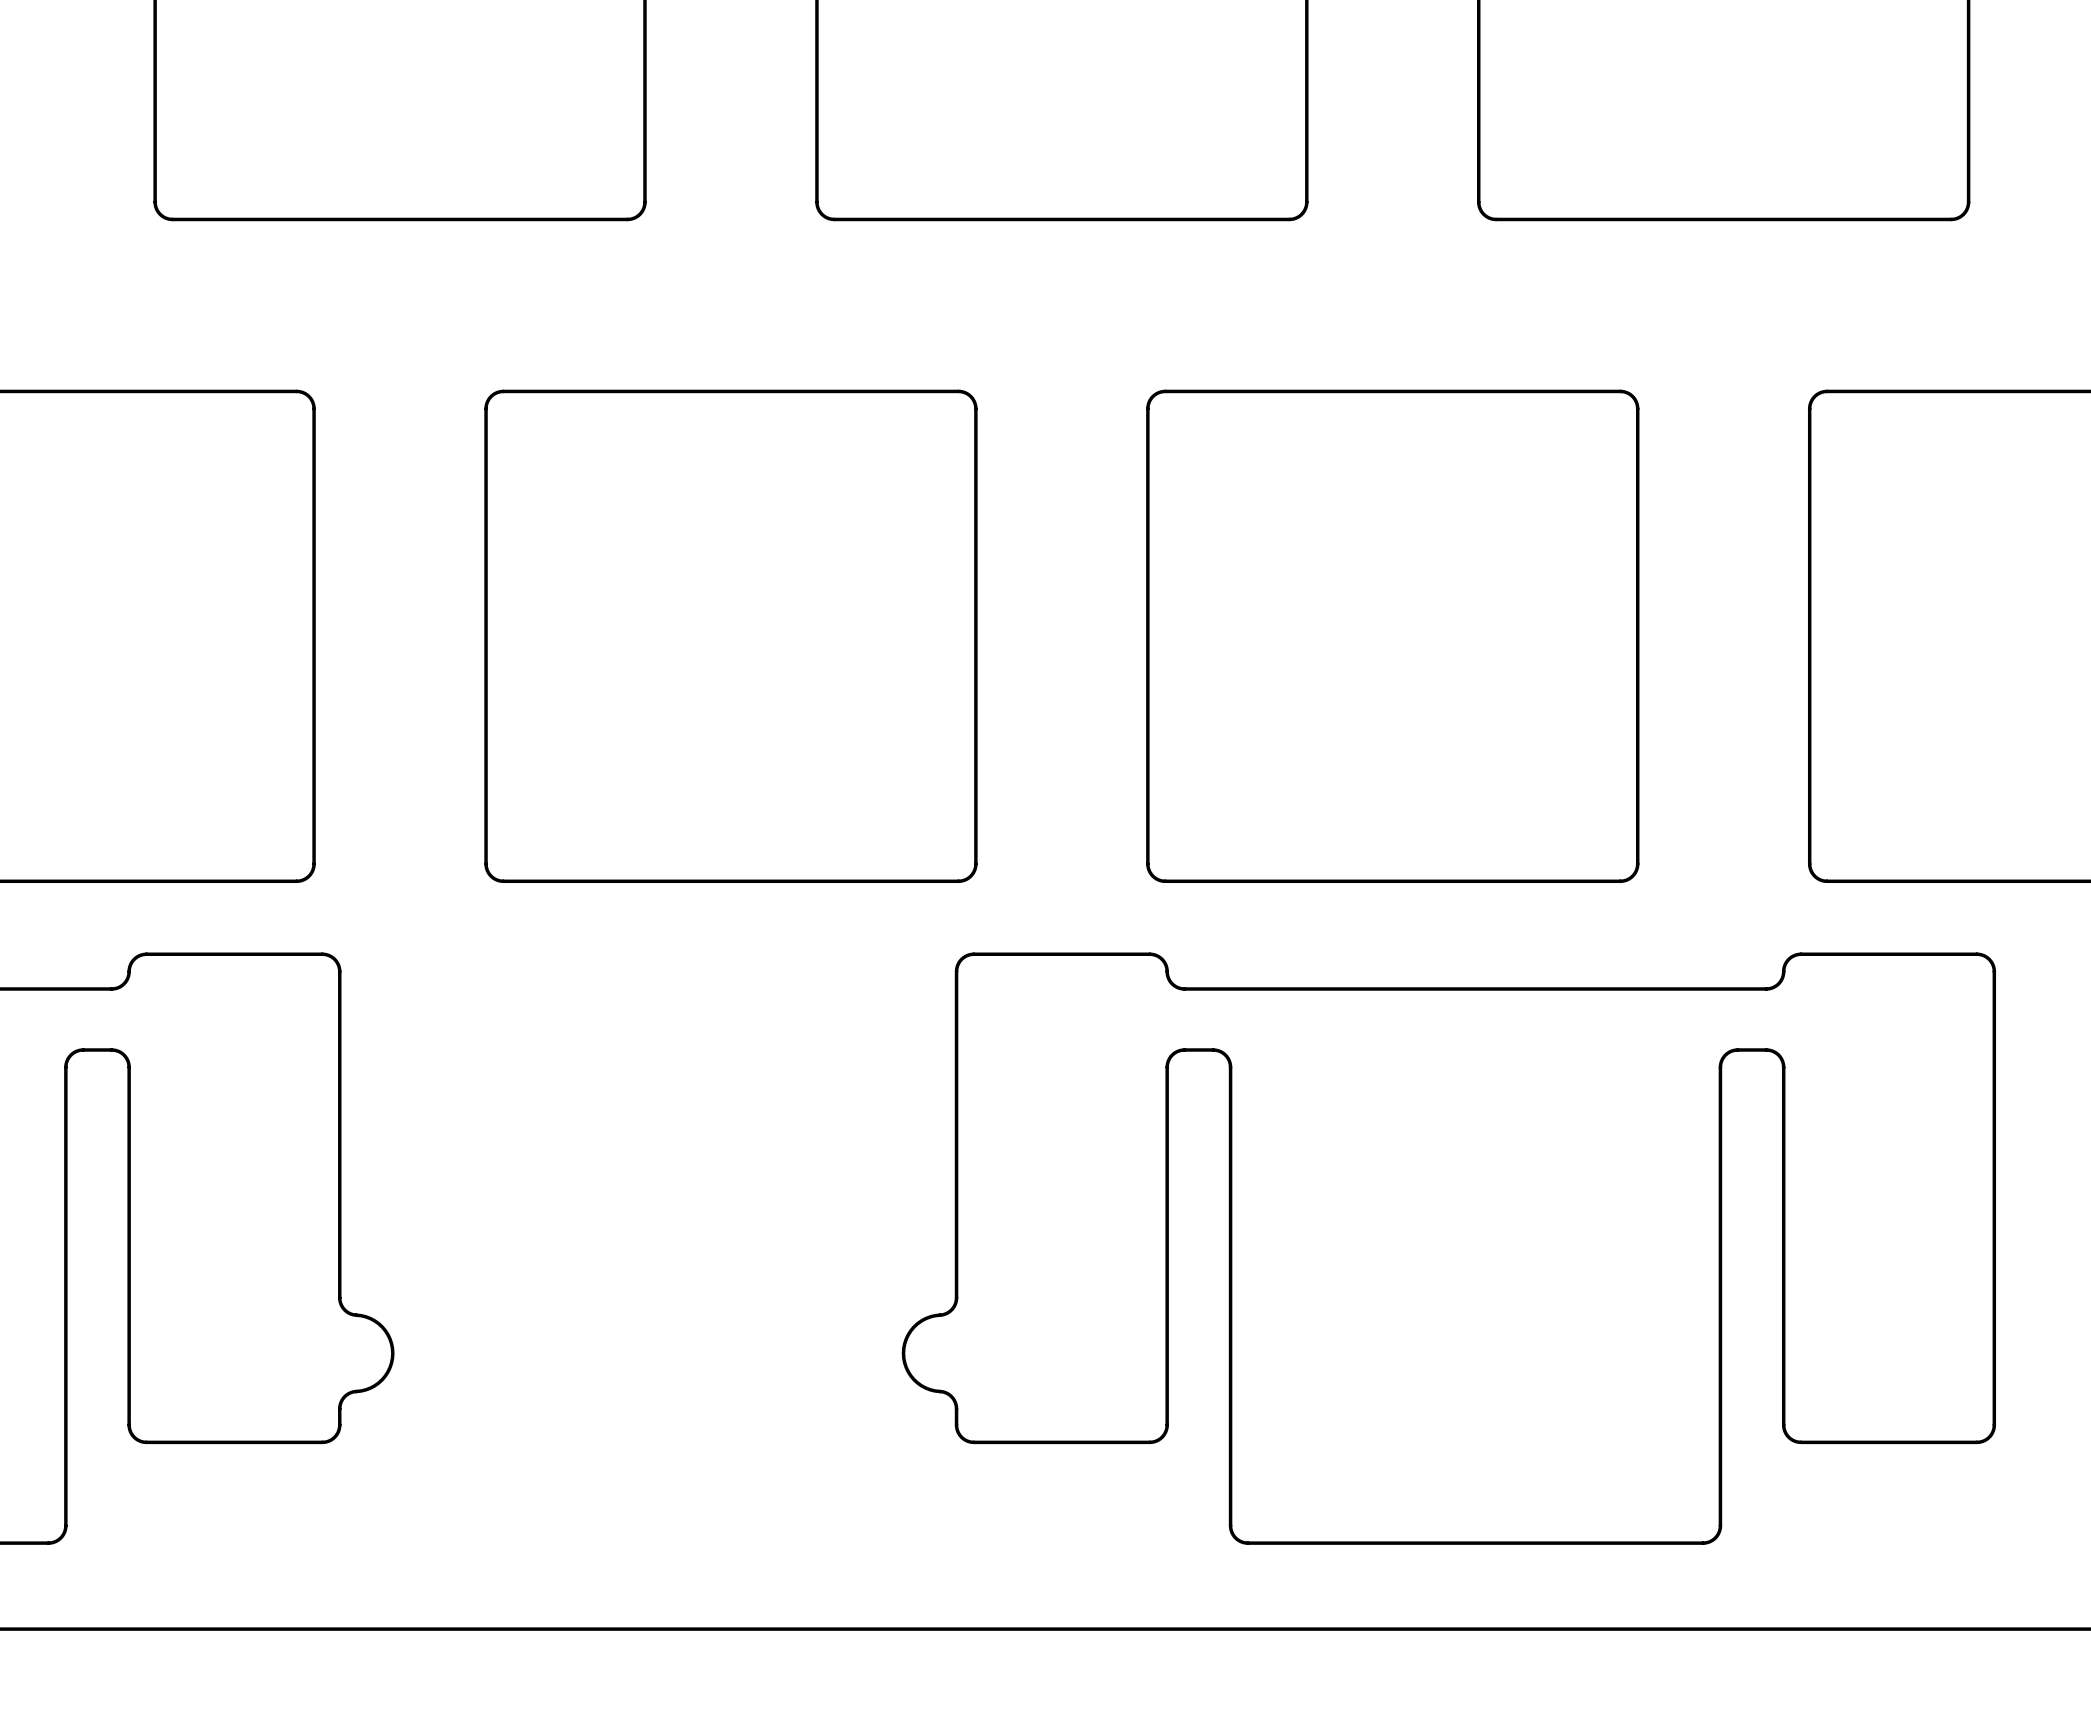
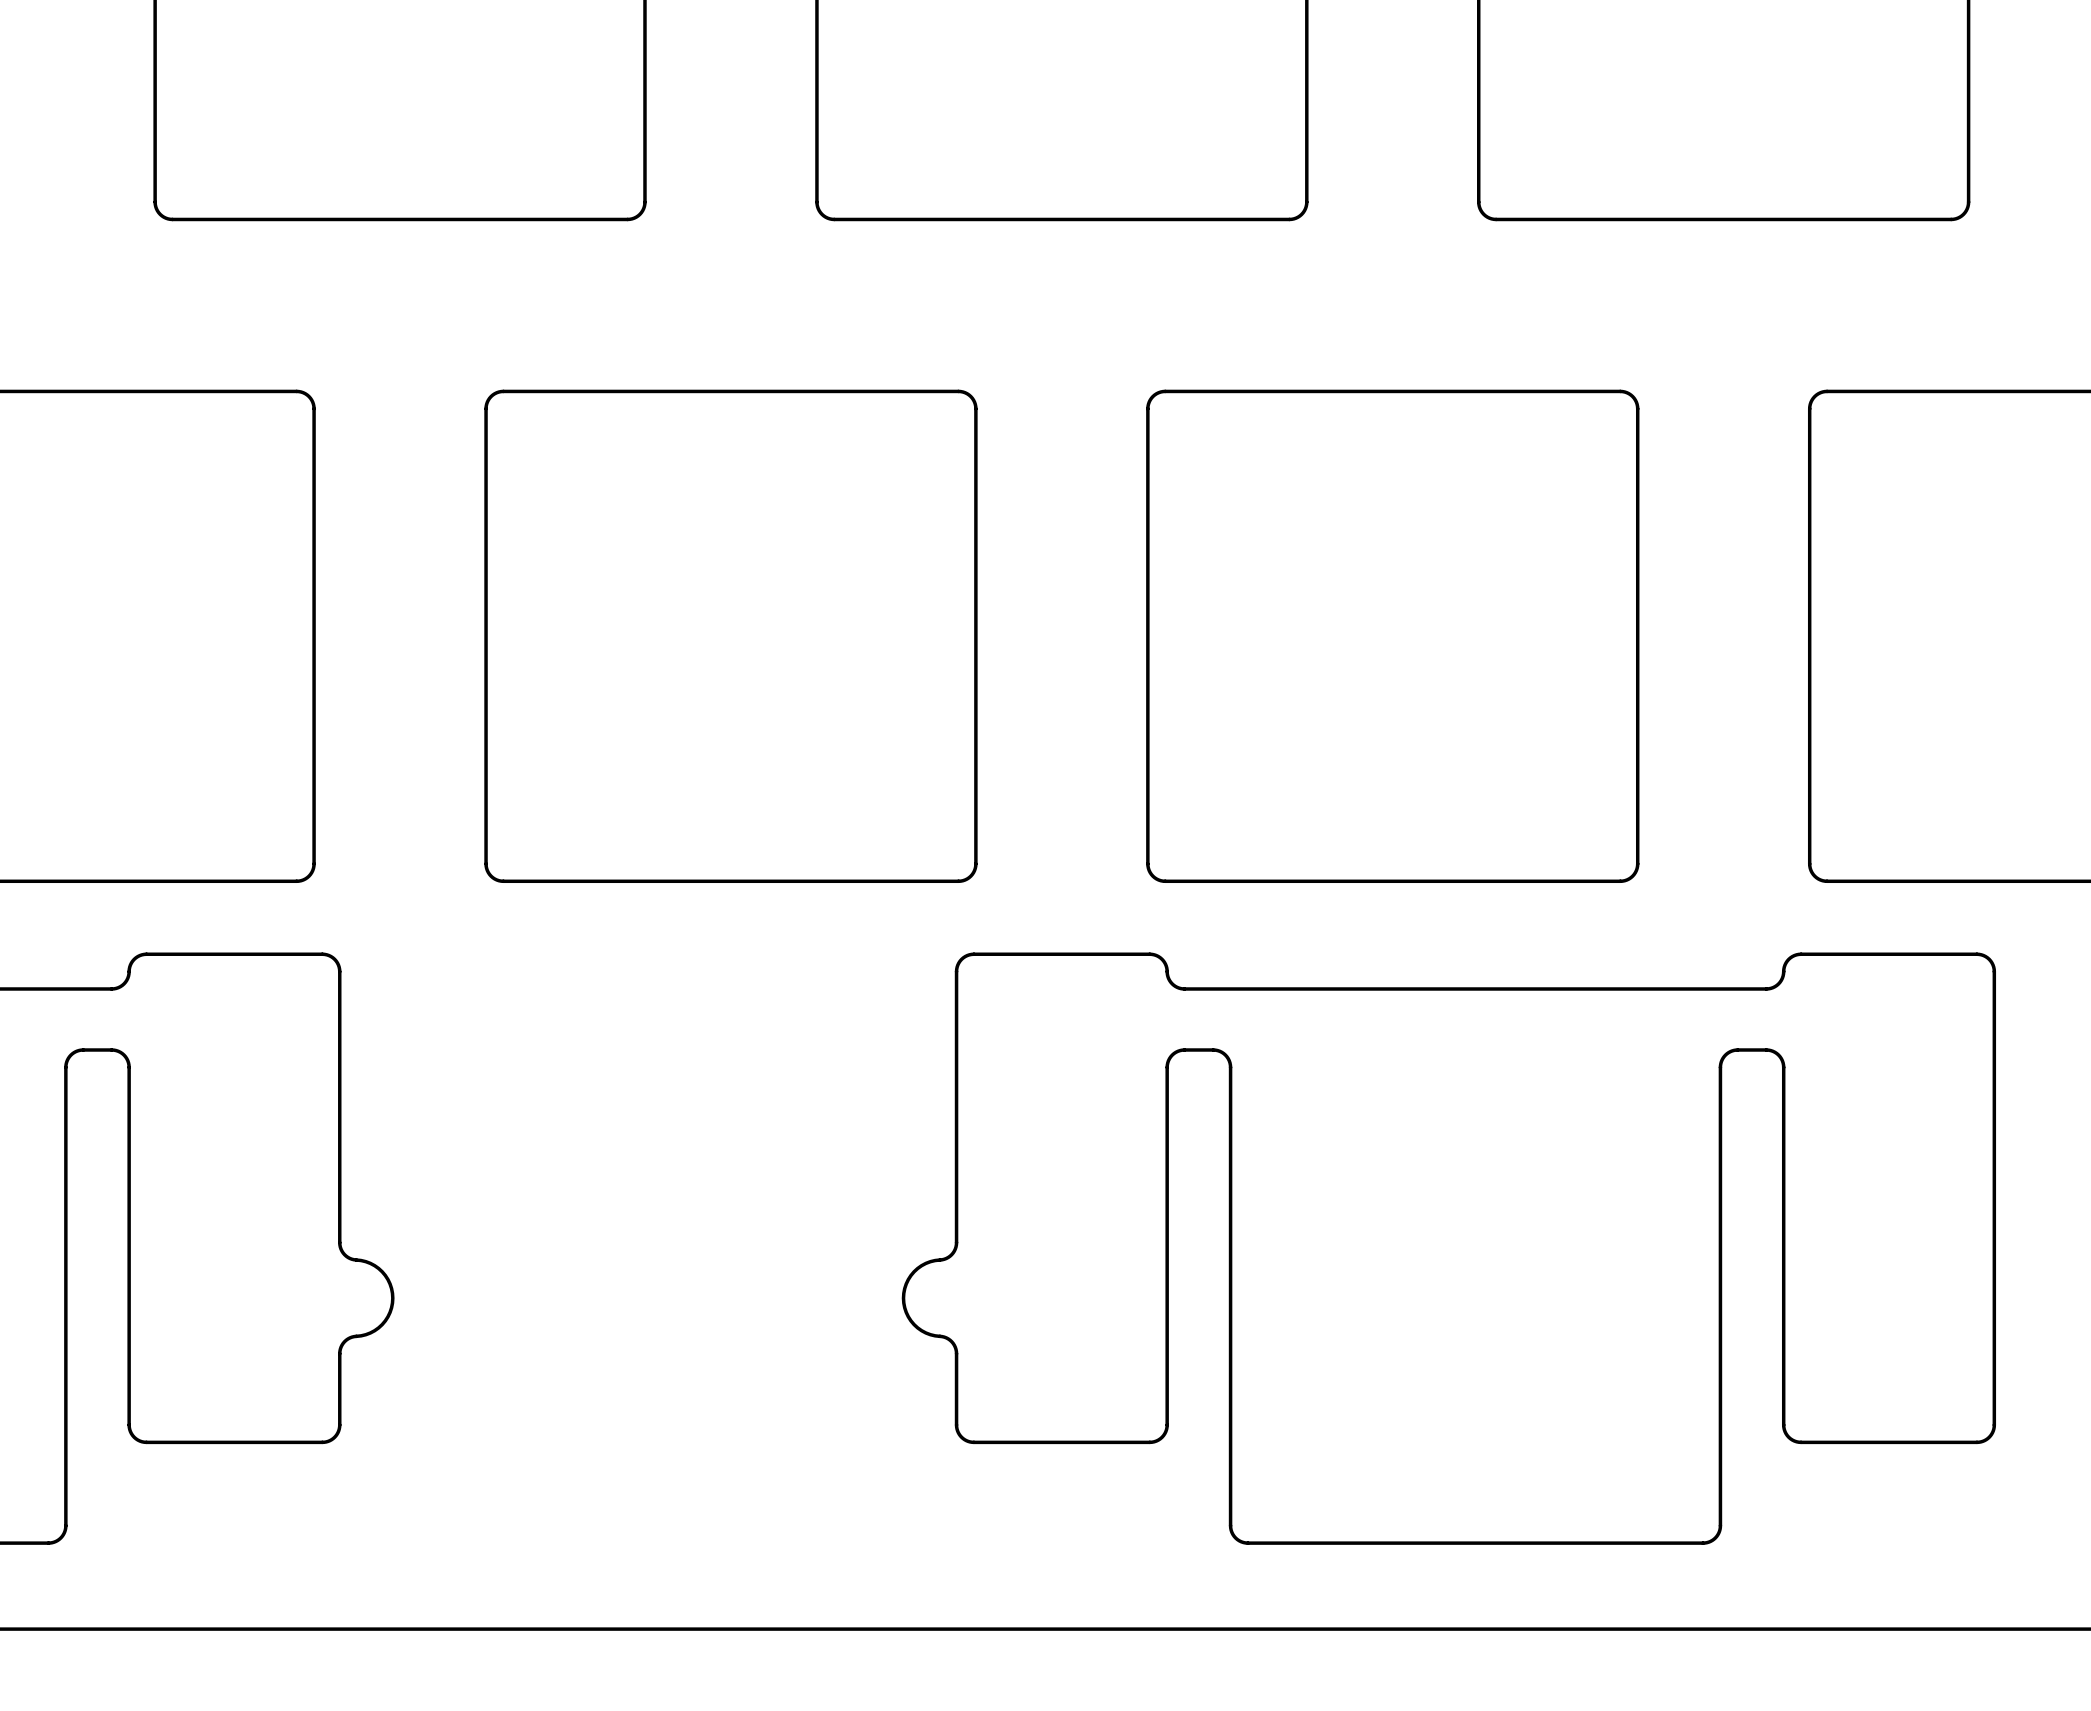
board edge: (339, 1242) (339, 1297) (341, 1306) (349, 1313) (370, 1318) (382, 1326) (390, 1339) (392, 1353) (390, 1367) (382, 1379) (370, 1388) (347, 1394) (341, 1400) (339, 1408) -> (339, 1242) (341, 1251) (347, 1257) (370, 1263) (382, 1271) (390, 1283) (392, 1298) (390, 1312) (382, 1324) (370, 1332) (349, 1337) (341, 1345) (339, 1353) (339, 1408)
board edge: (956, 1242) (956, 1297) (954, 1306) (946, 1313) (925, 1318) (914, 1326) (906, 1339) (903, 1353) (906, 1367) (914, 1379) (925, 1388) (948, 1394) (954, 1400) (956, 1408) -> (956, 1242) (954, 1251) (948, 1257) (925, 1263) (914, 1271) (906, 1283) (903, 1298) (906, 1312) (914, 1324) (925, 1332) (946, 1337) (954, 1345) (956, 1353) (956, 1408)

